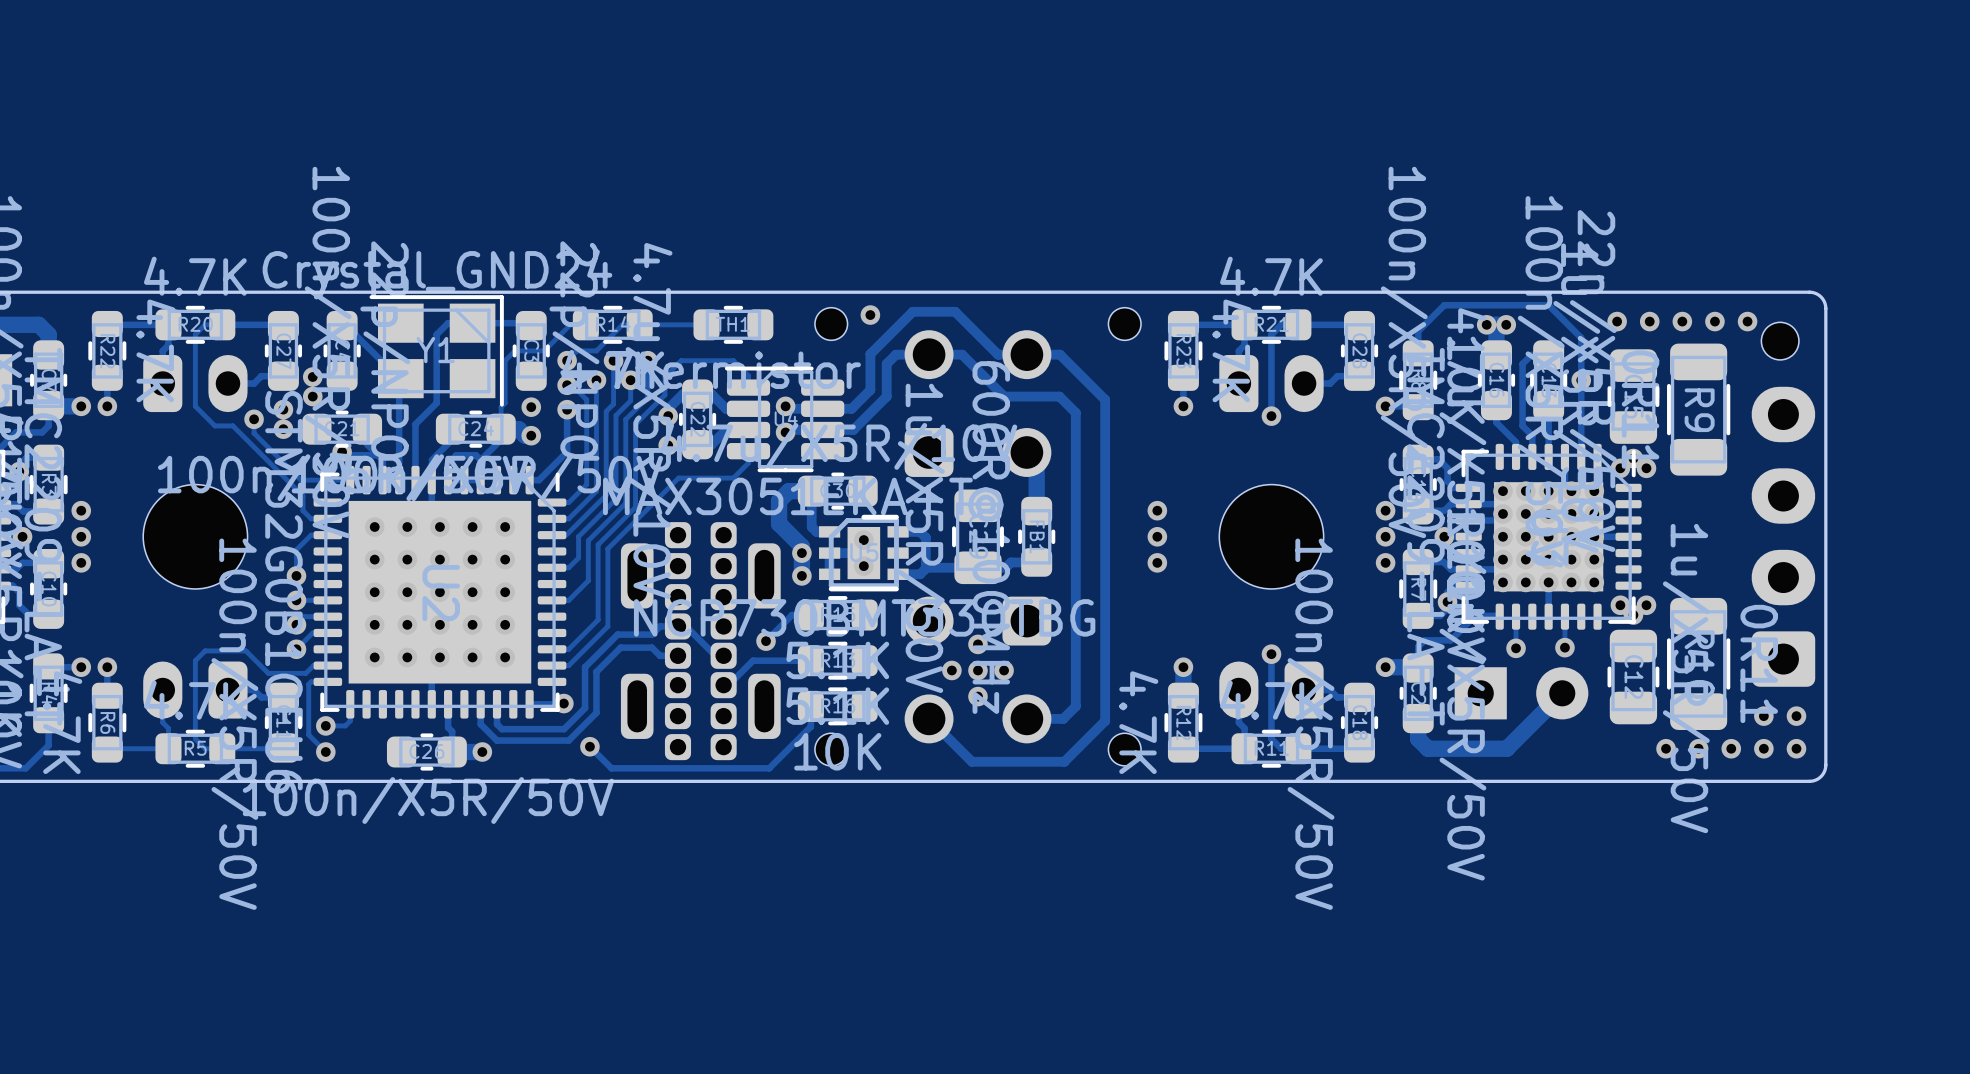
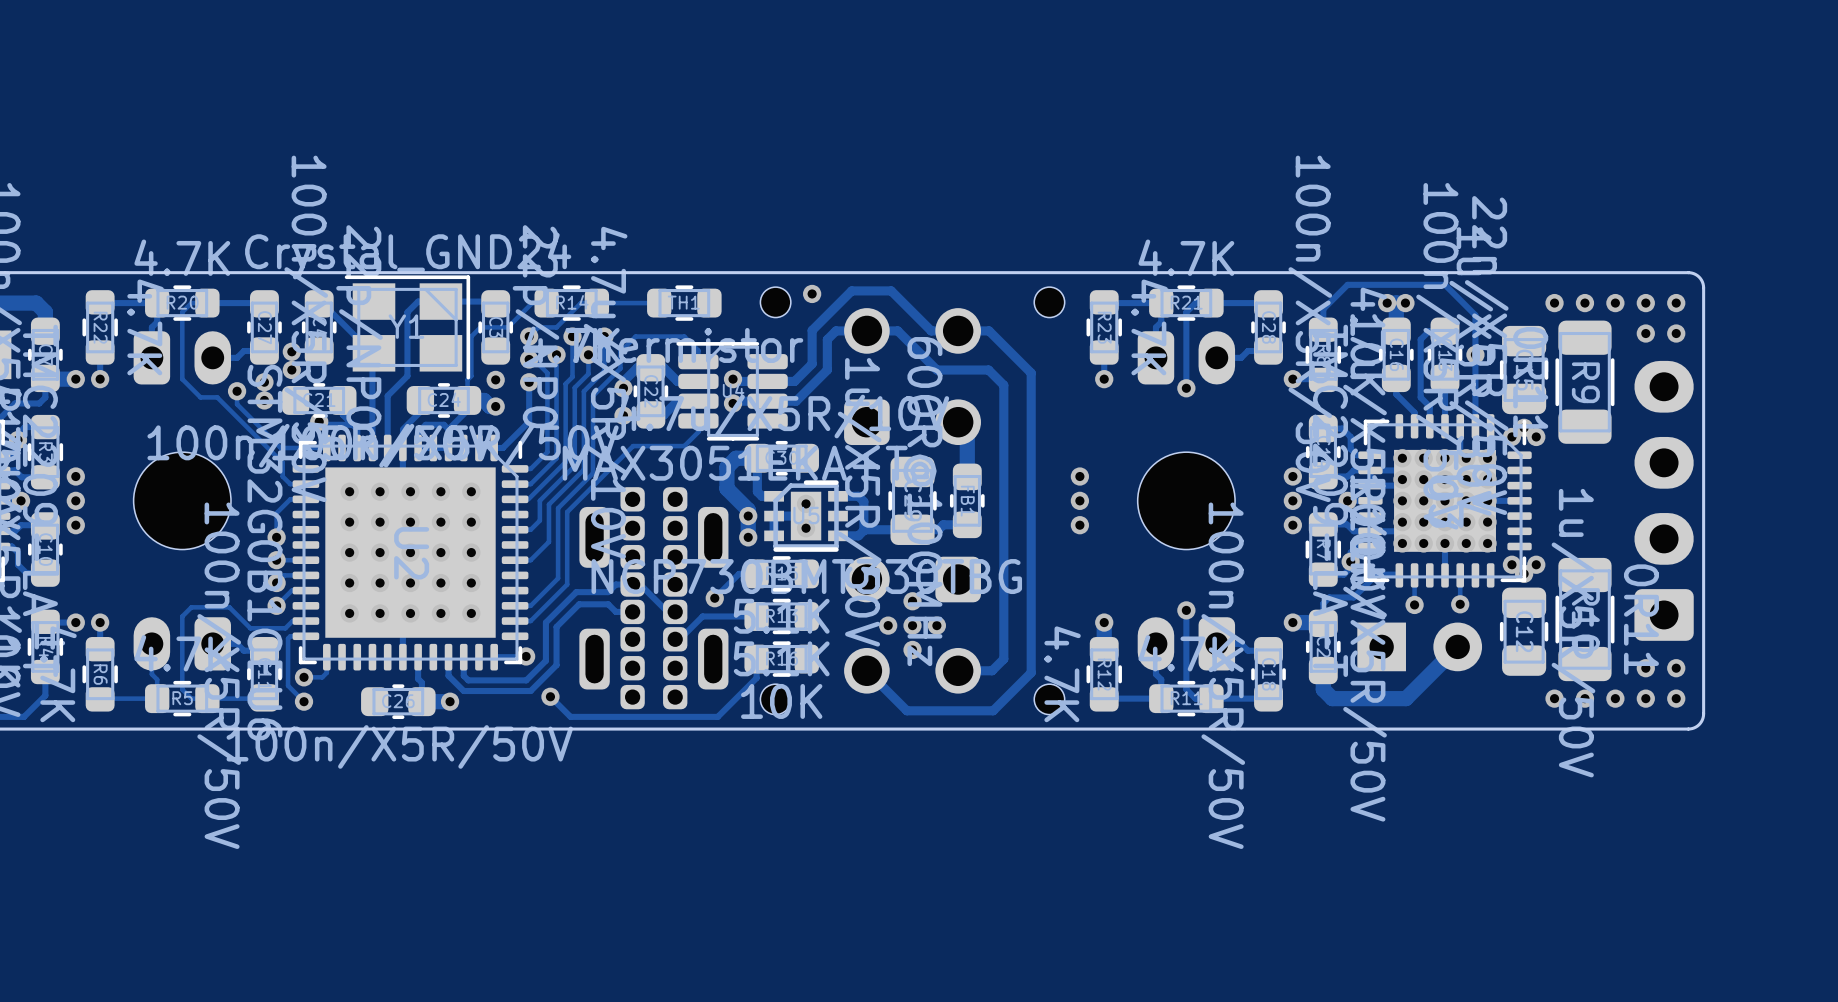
via: (1617, 321) -> none
via: (1649, 321) -> none
via: (1682, 321) -> none
via: (1714, 321) -> none
via: (1747, 321) -> none
via: none -> (1554, 303)
via: none -> (1584, 303)
via: none -> (1615, 303)
via: none -> (1645, 303)
via: none -> (1676, 303)
part: (1780, 341) -> none
via: none -> (1645, 333)
via: none -> (1676, 333)

